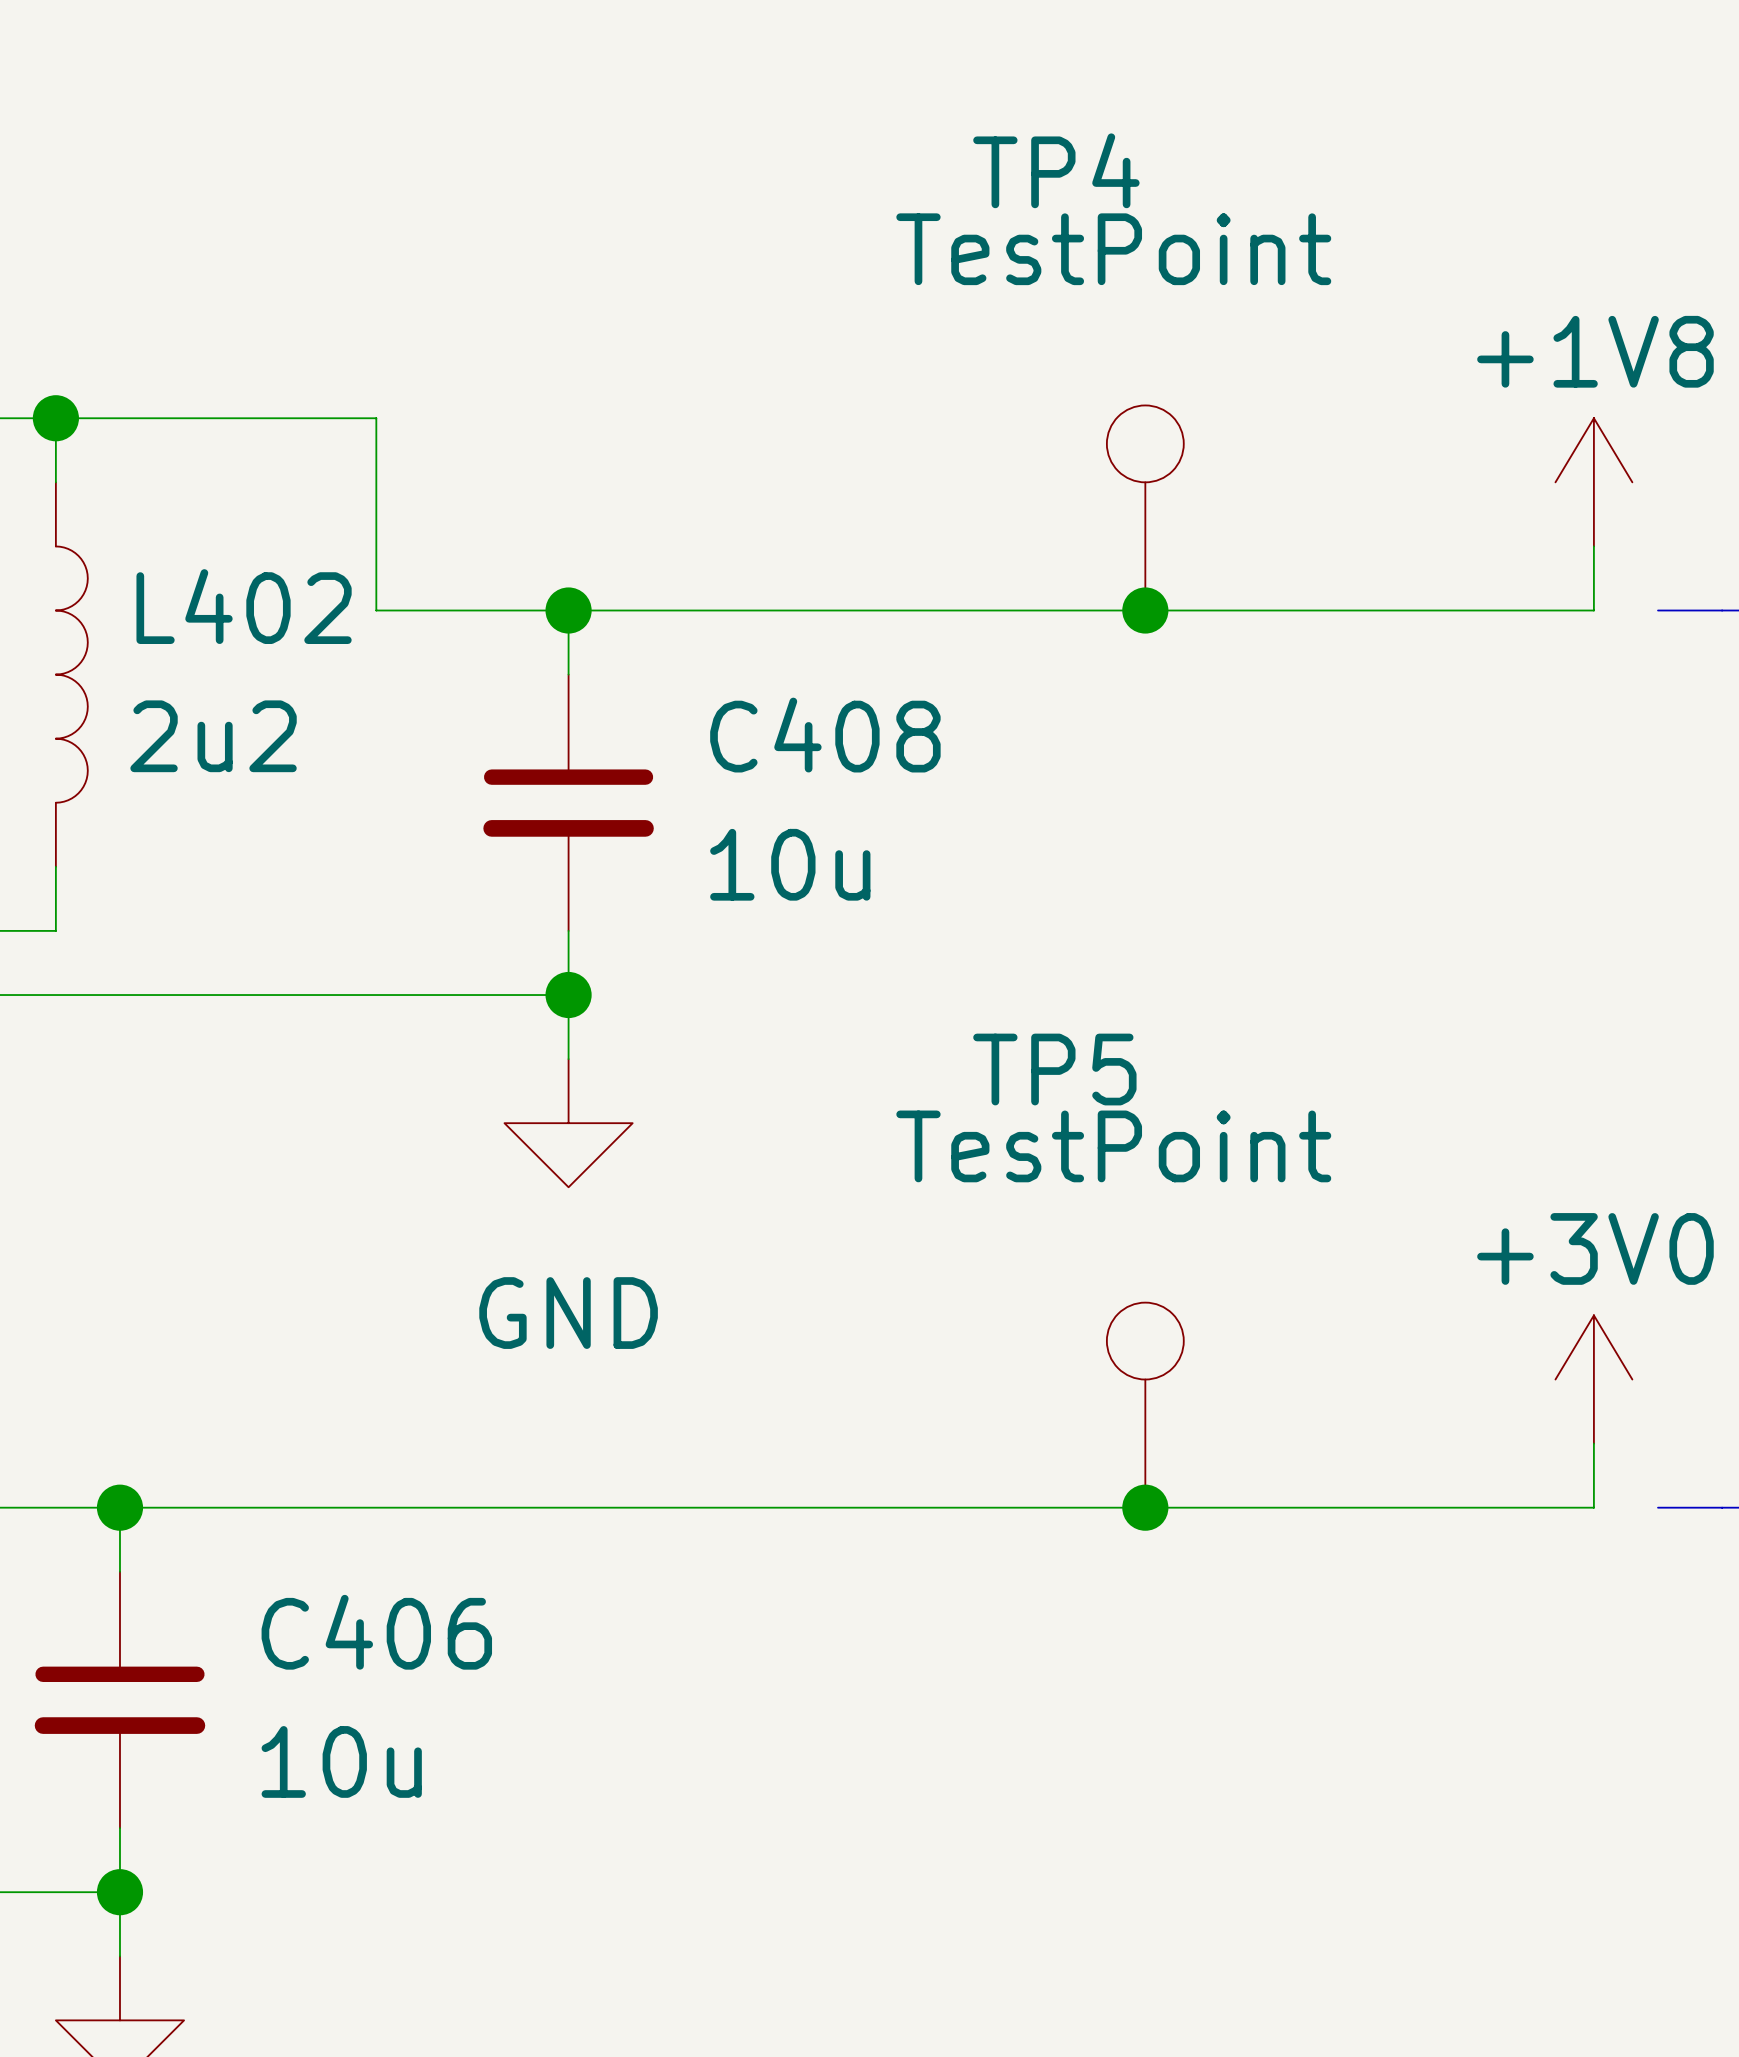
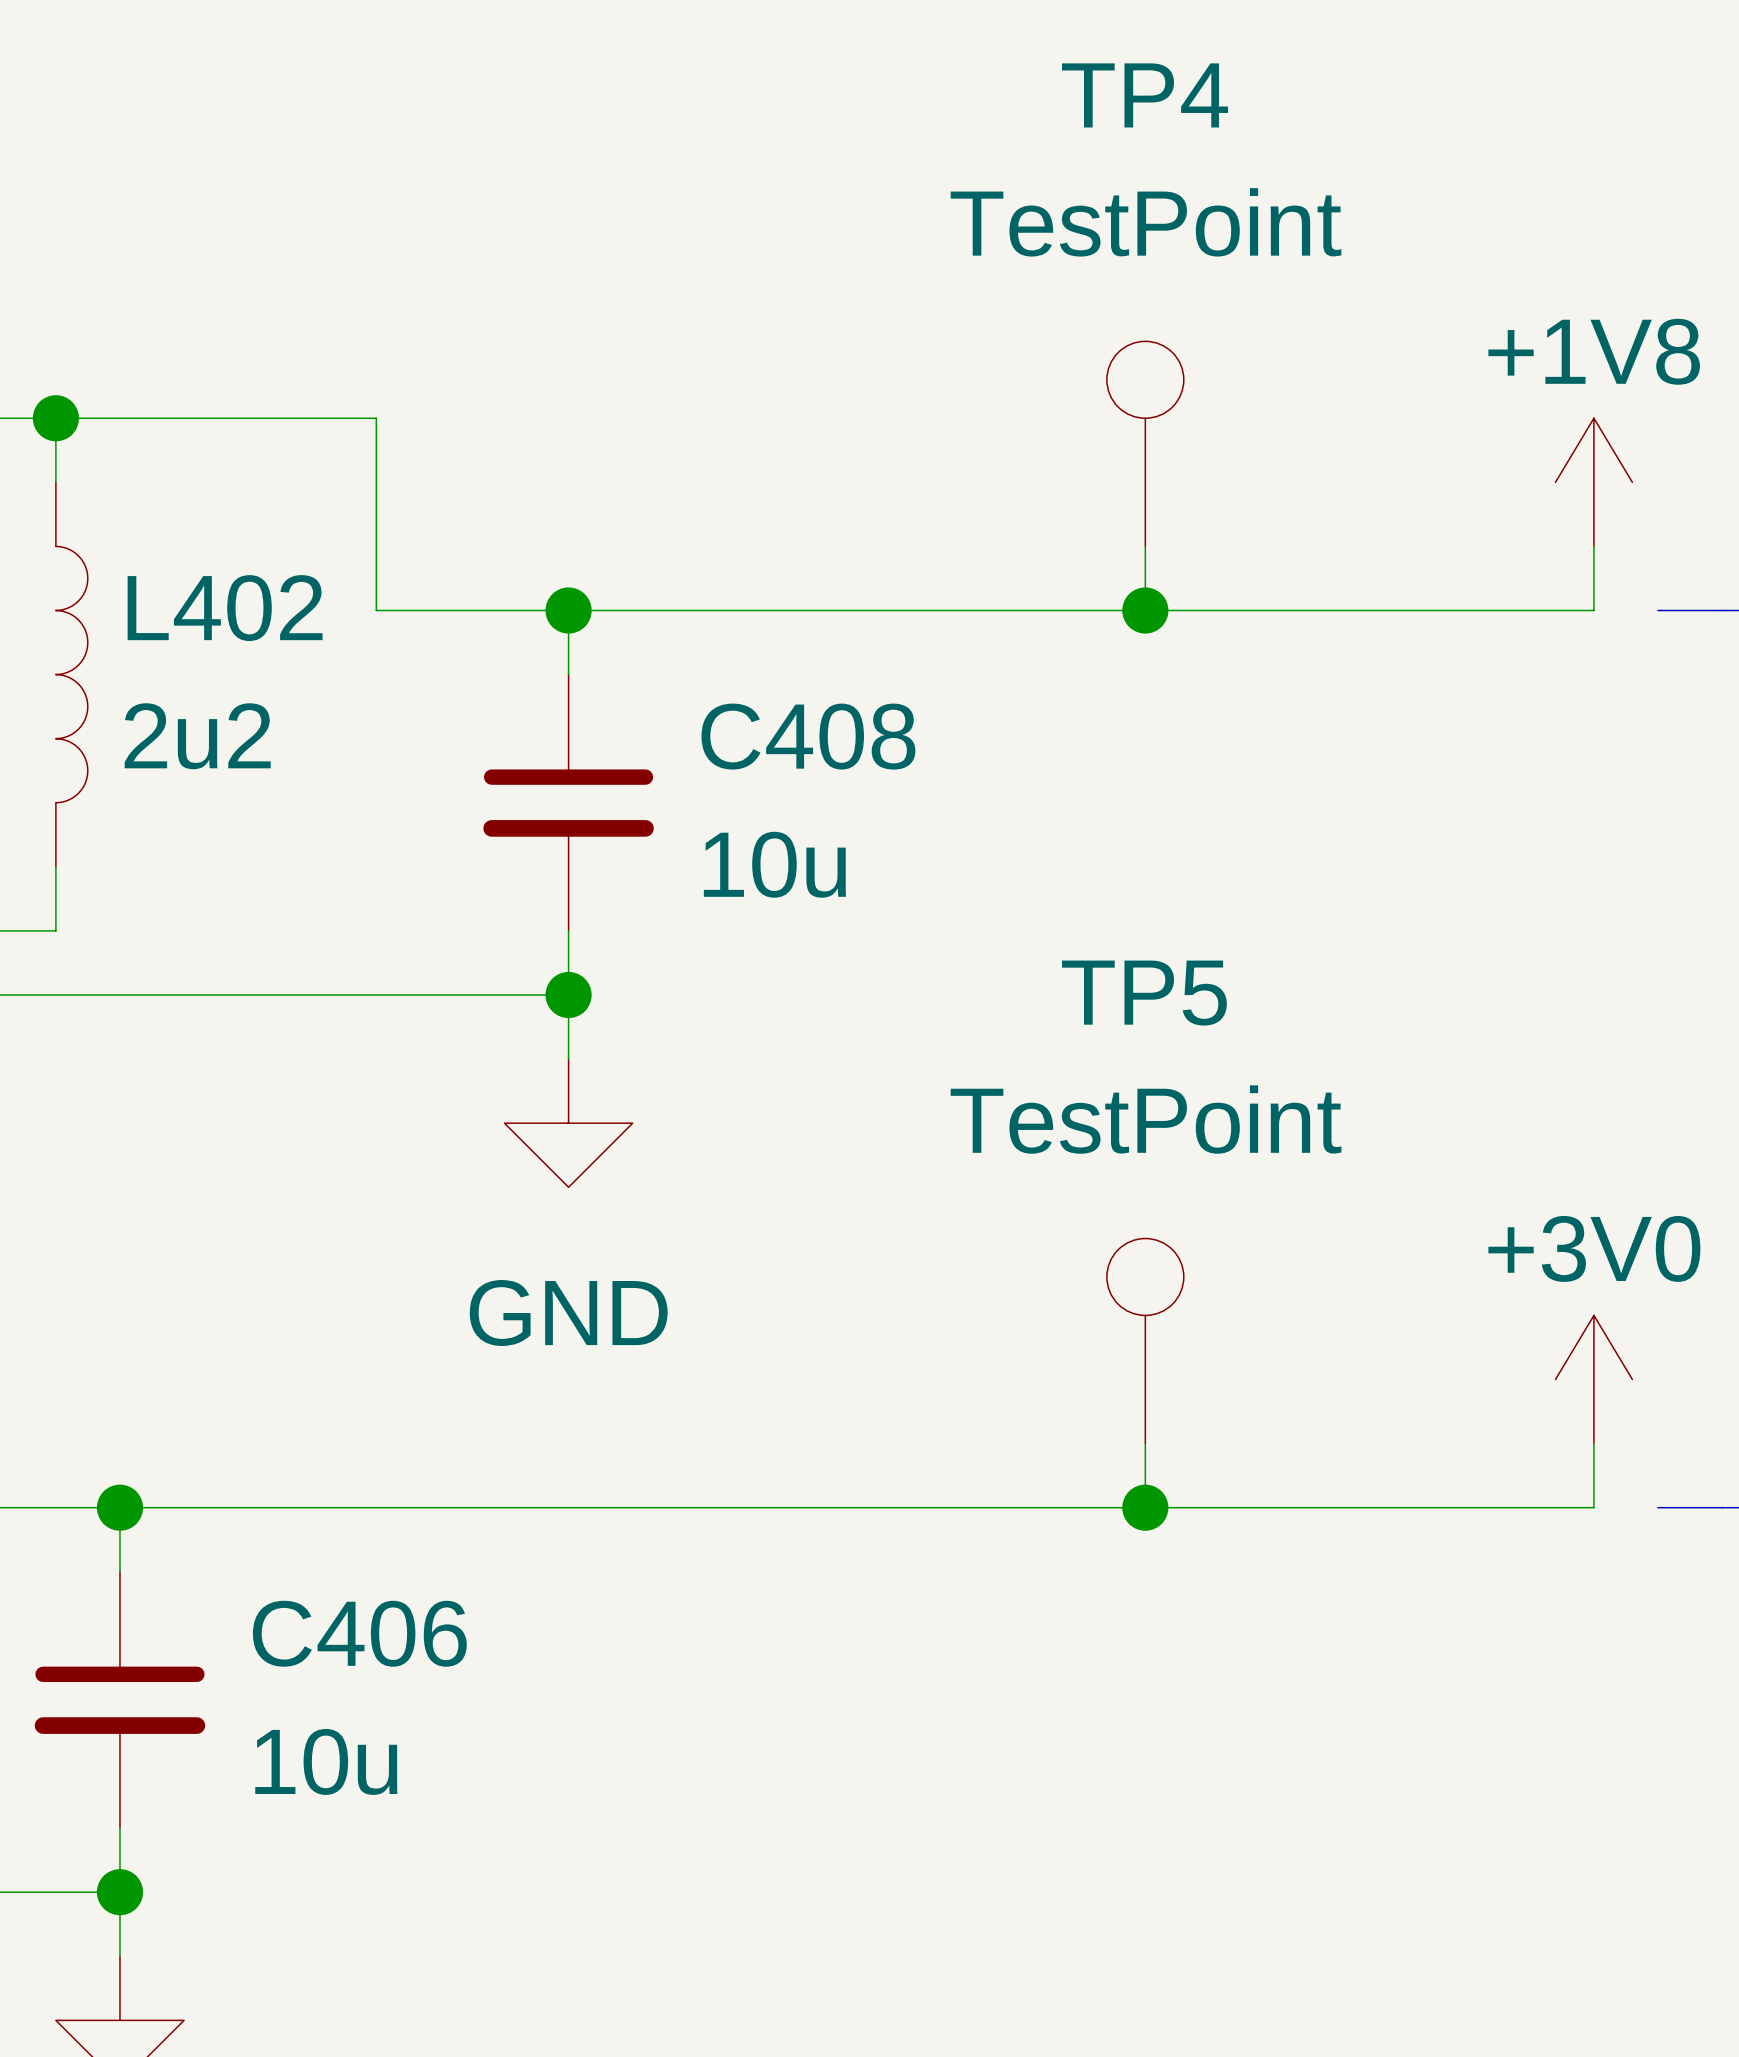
TP4 name position: TP4 (1056, 170) -> TP4 (1145, 95)
TP4 value position: TestPoint (1113, 249) -> TestPoint (1146, 222)
TP4 position: (1145, 507) -> (1145, 443)
TP5 name position: TP5 (1054, 1069) -> TP5 (1144, 993)
TP5 value position: TestPoint (1113, 1146) -> TestPoint (1146, 1119)
TP5 position: (1145, 1405) -> (1145, 1341)

